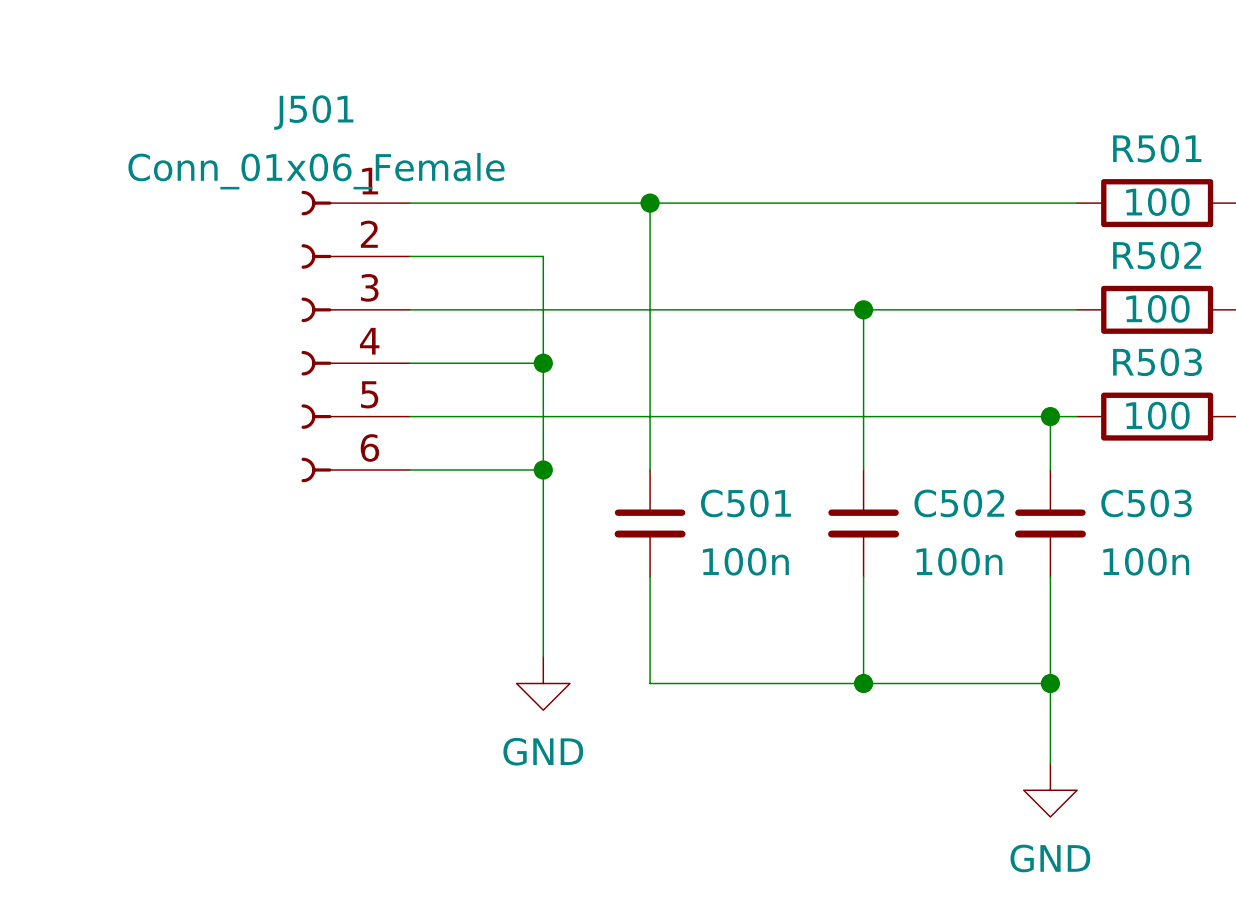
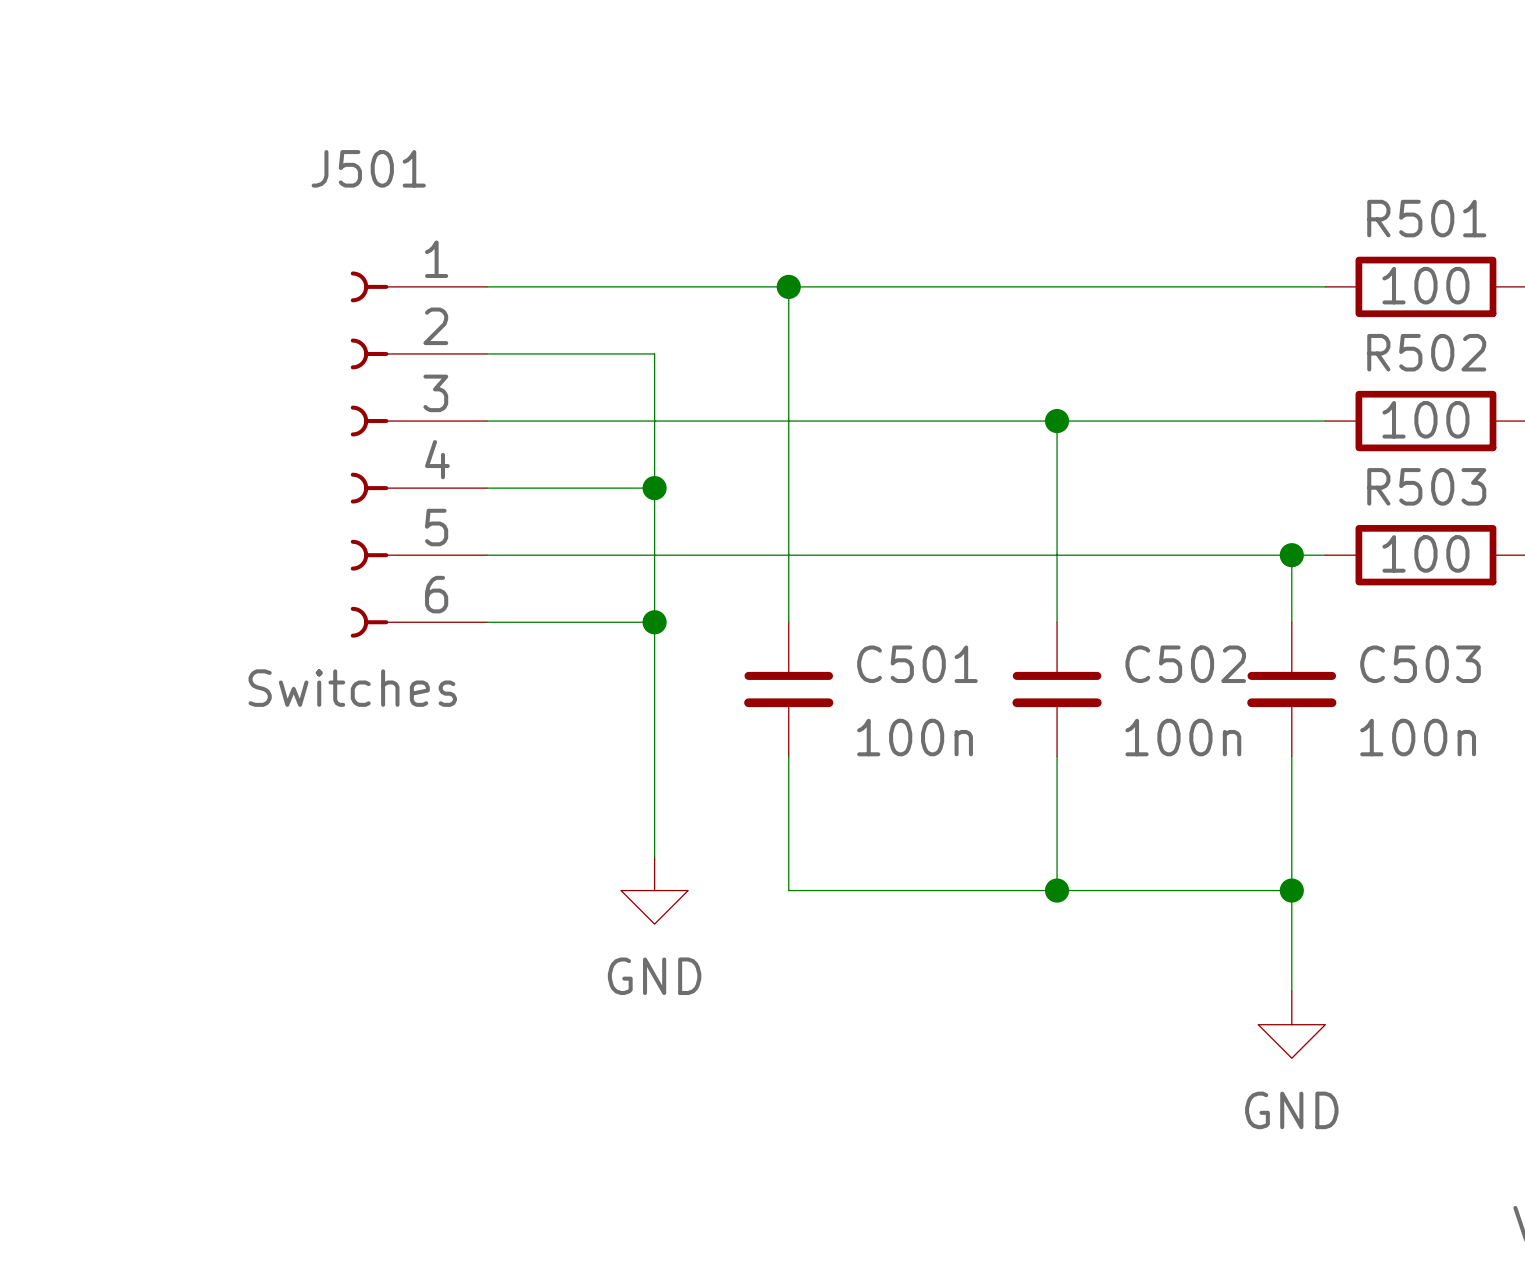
J501 value: Conn_01x06_Female (316, 171) -> Switches (352, 688)

